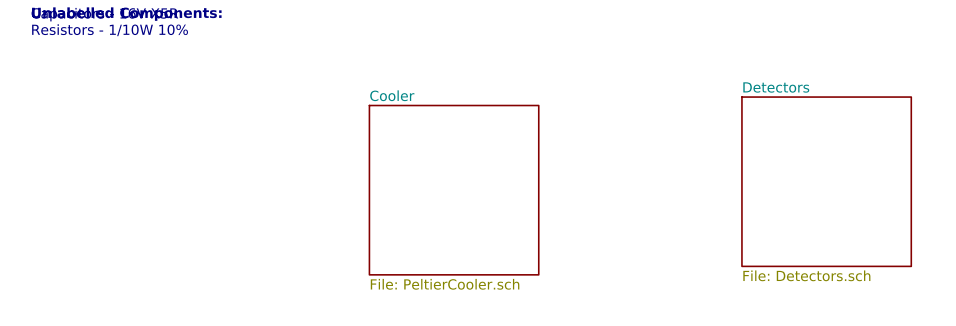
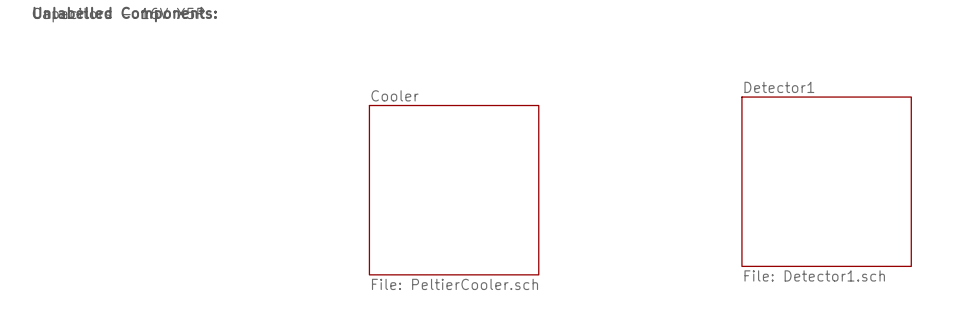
text: Resistors - 1/10W 10% (110, 30) -> none
sheet Detectors name: Detectors (776, 87) -> Detector1 (779, 87)
sheet Detectors value: File: Detectors.sch (806, 275) -> File: Detector1.sch (814, 275)

